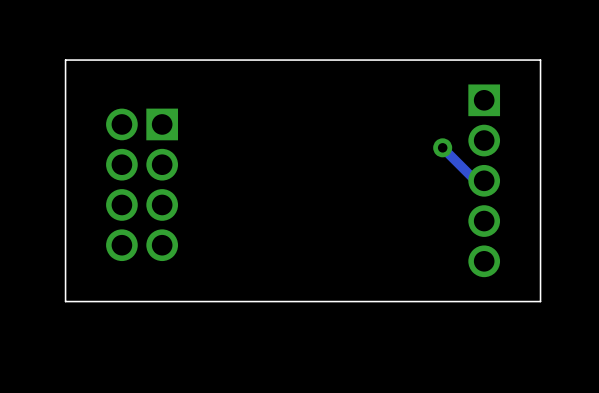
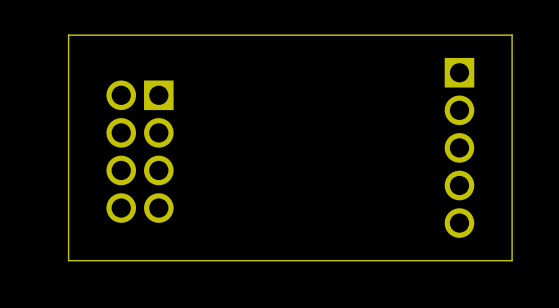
track: (442, 147) (475, 180) (484, 180) -> none
via: (442, 147) -> none

